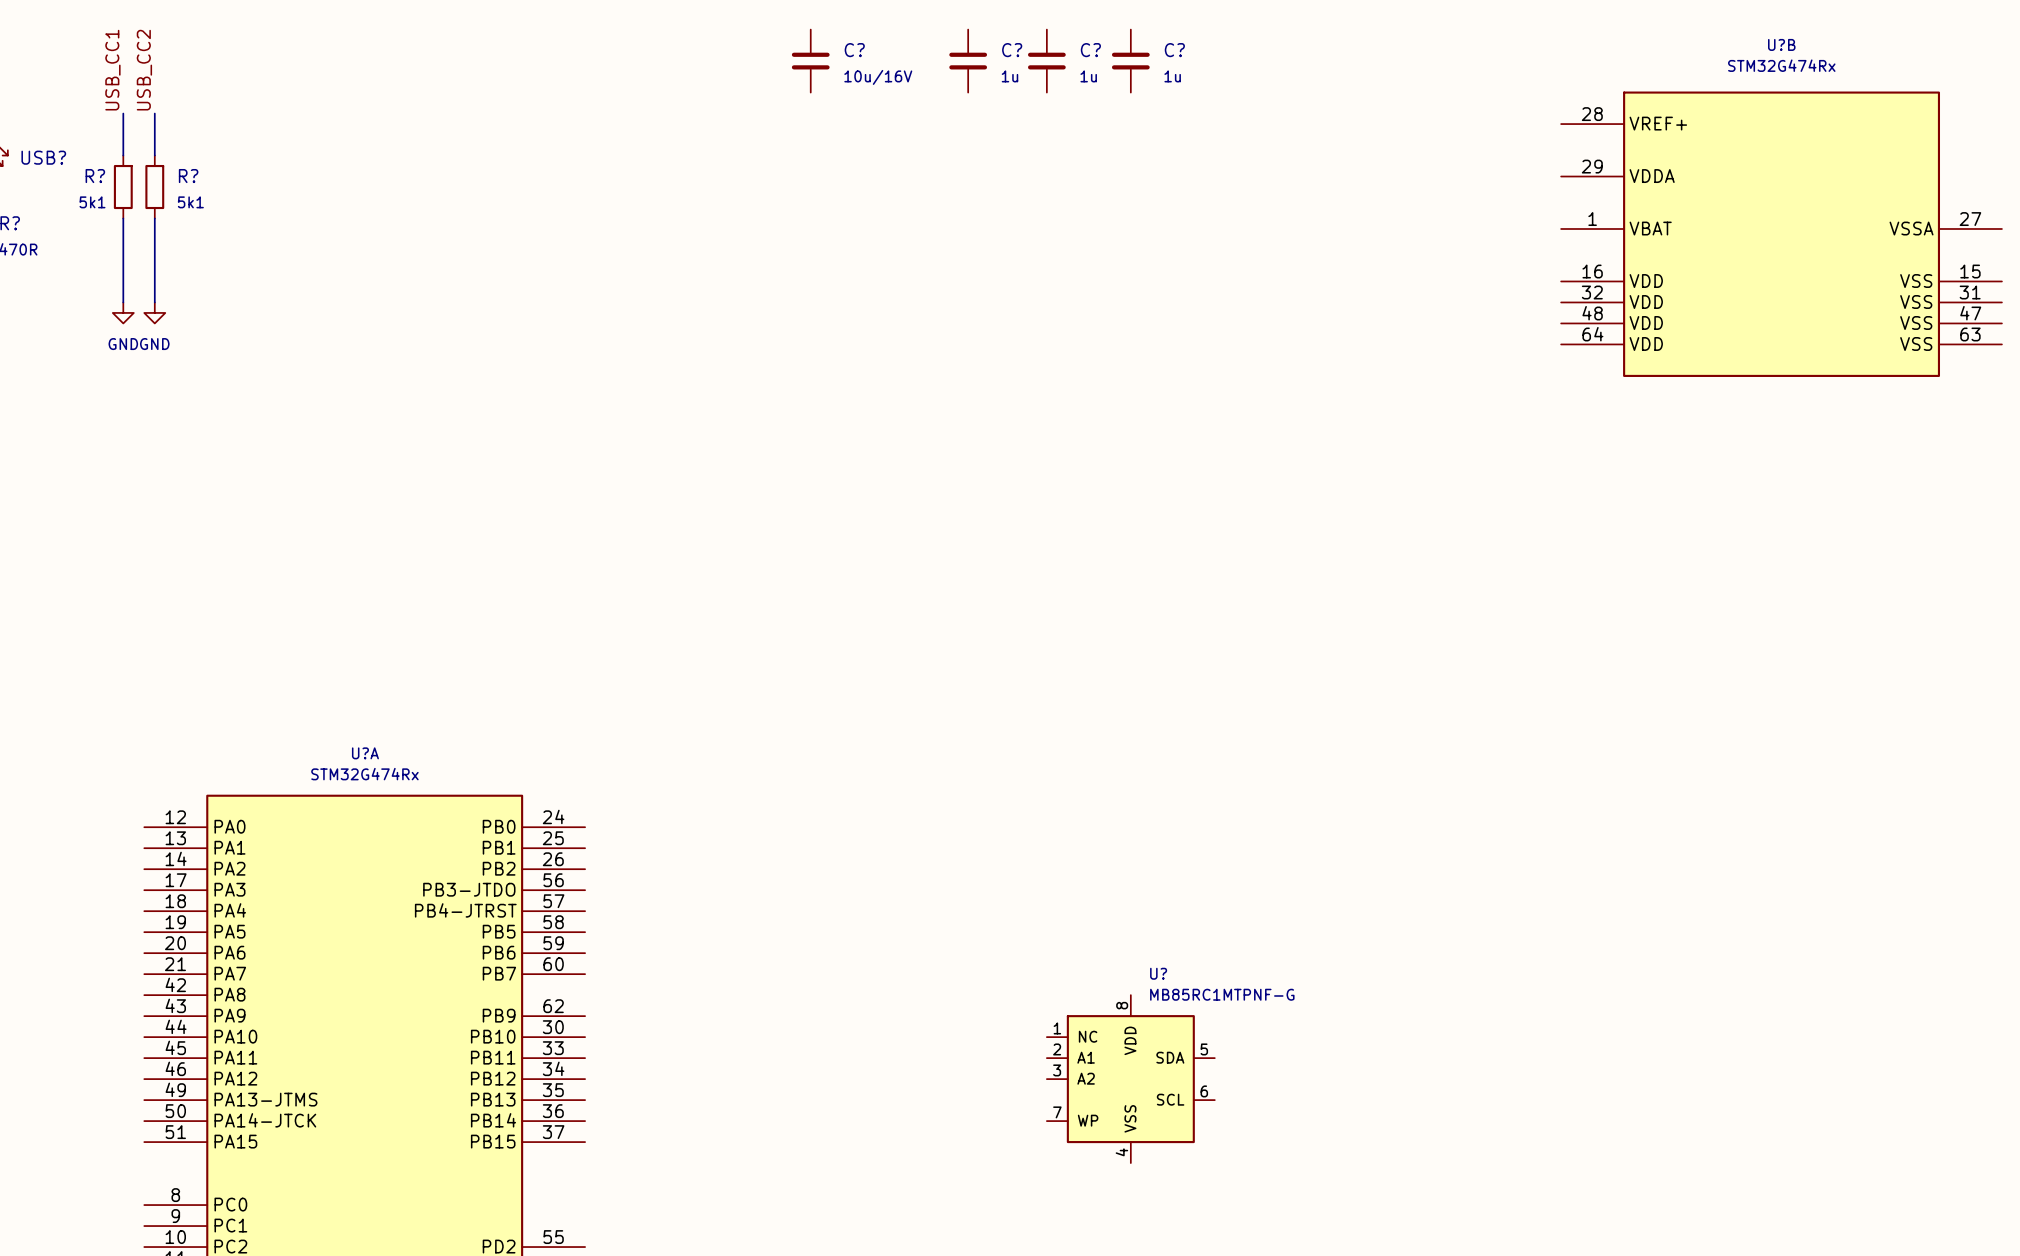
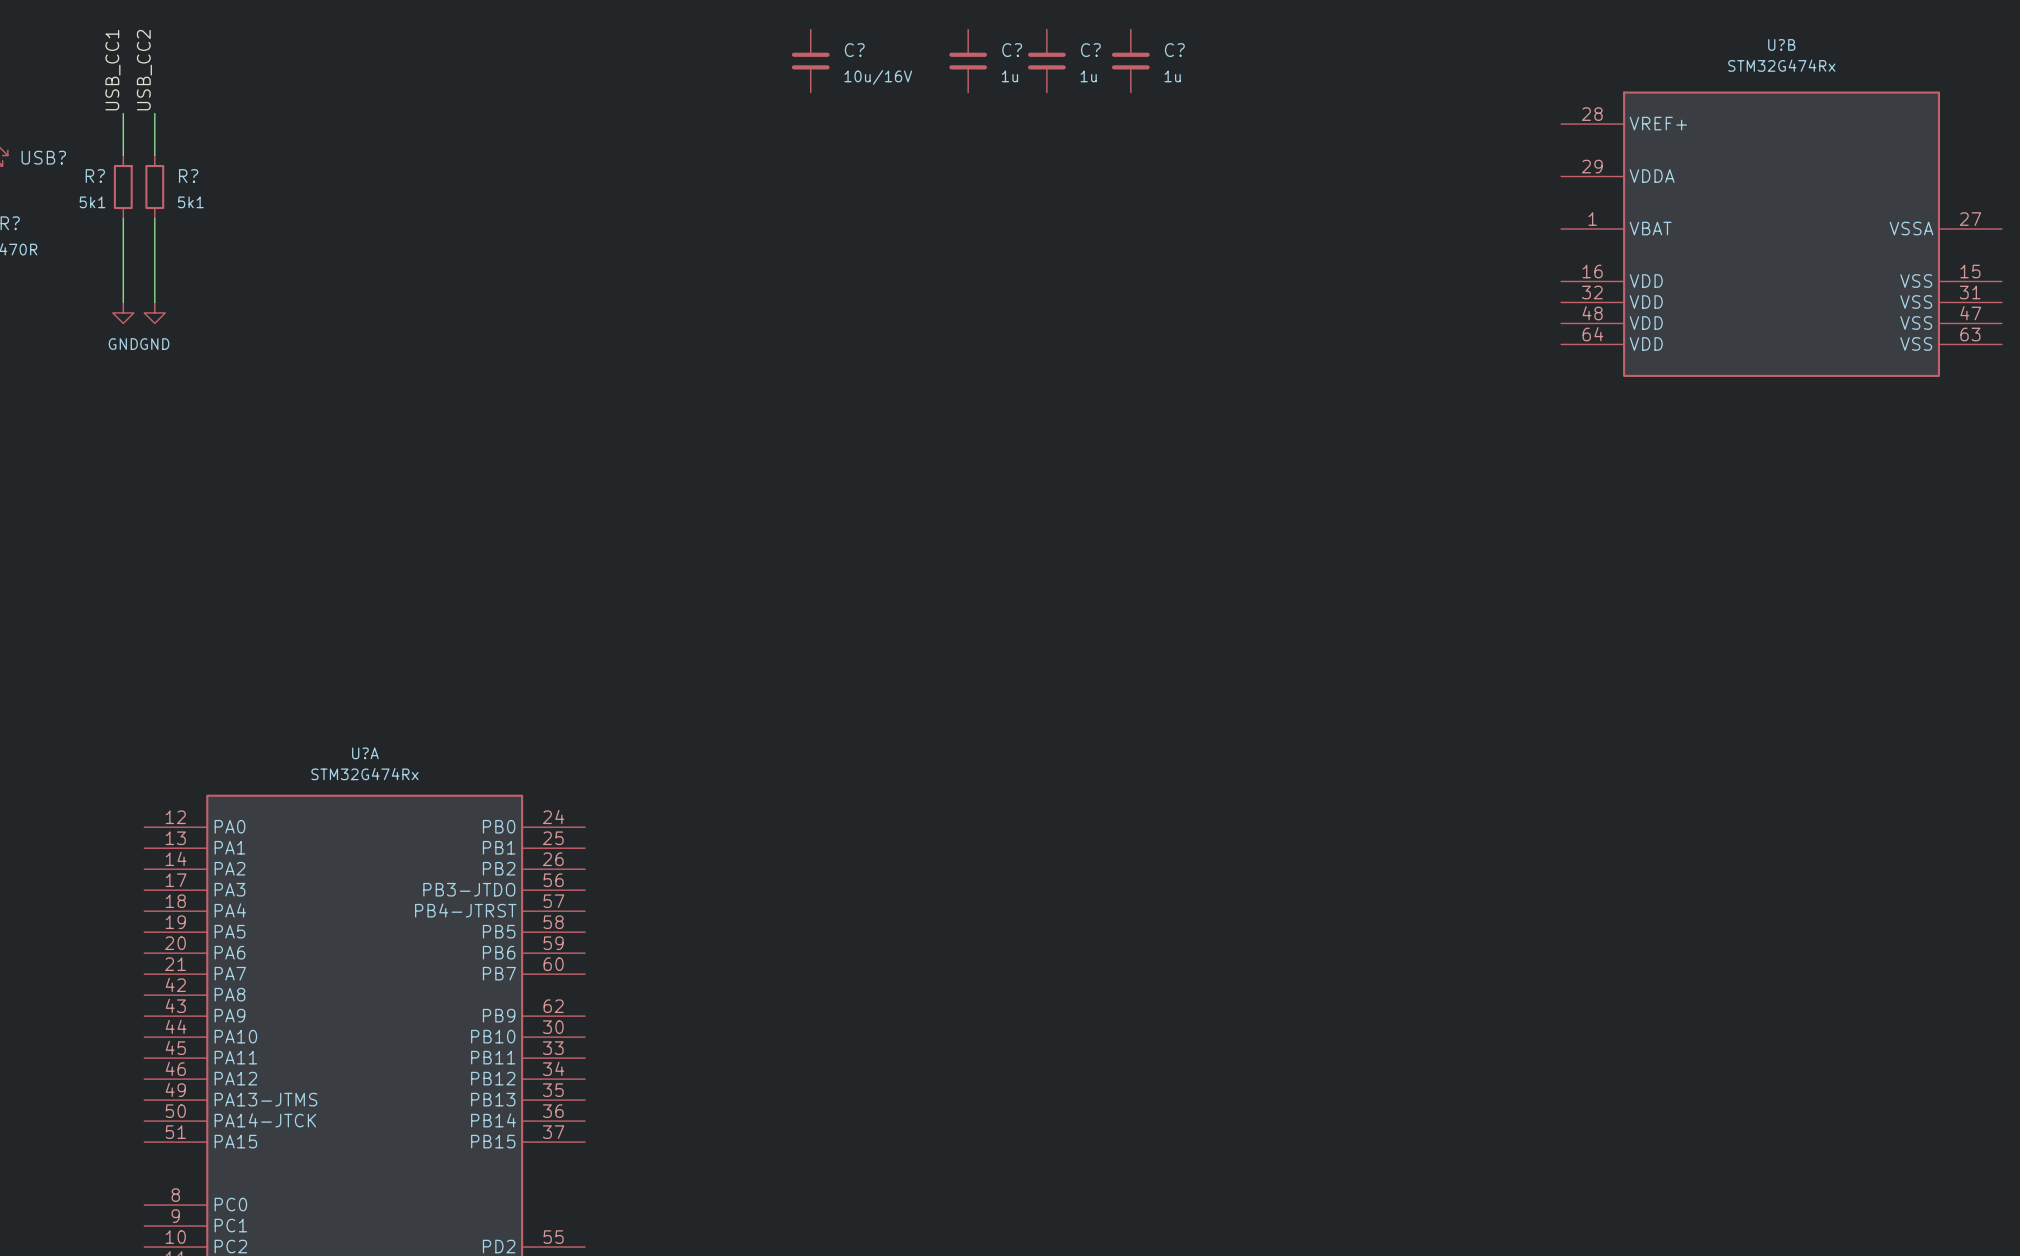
U?: MB85RC1MTPNF-G (1130, 1079) -> none

